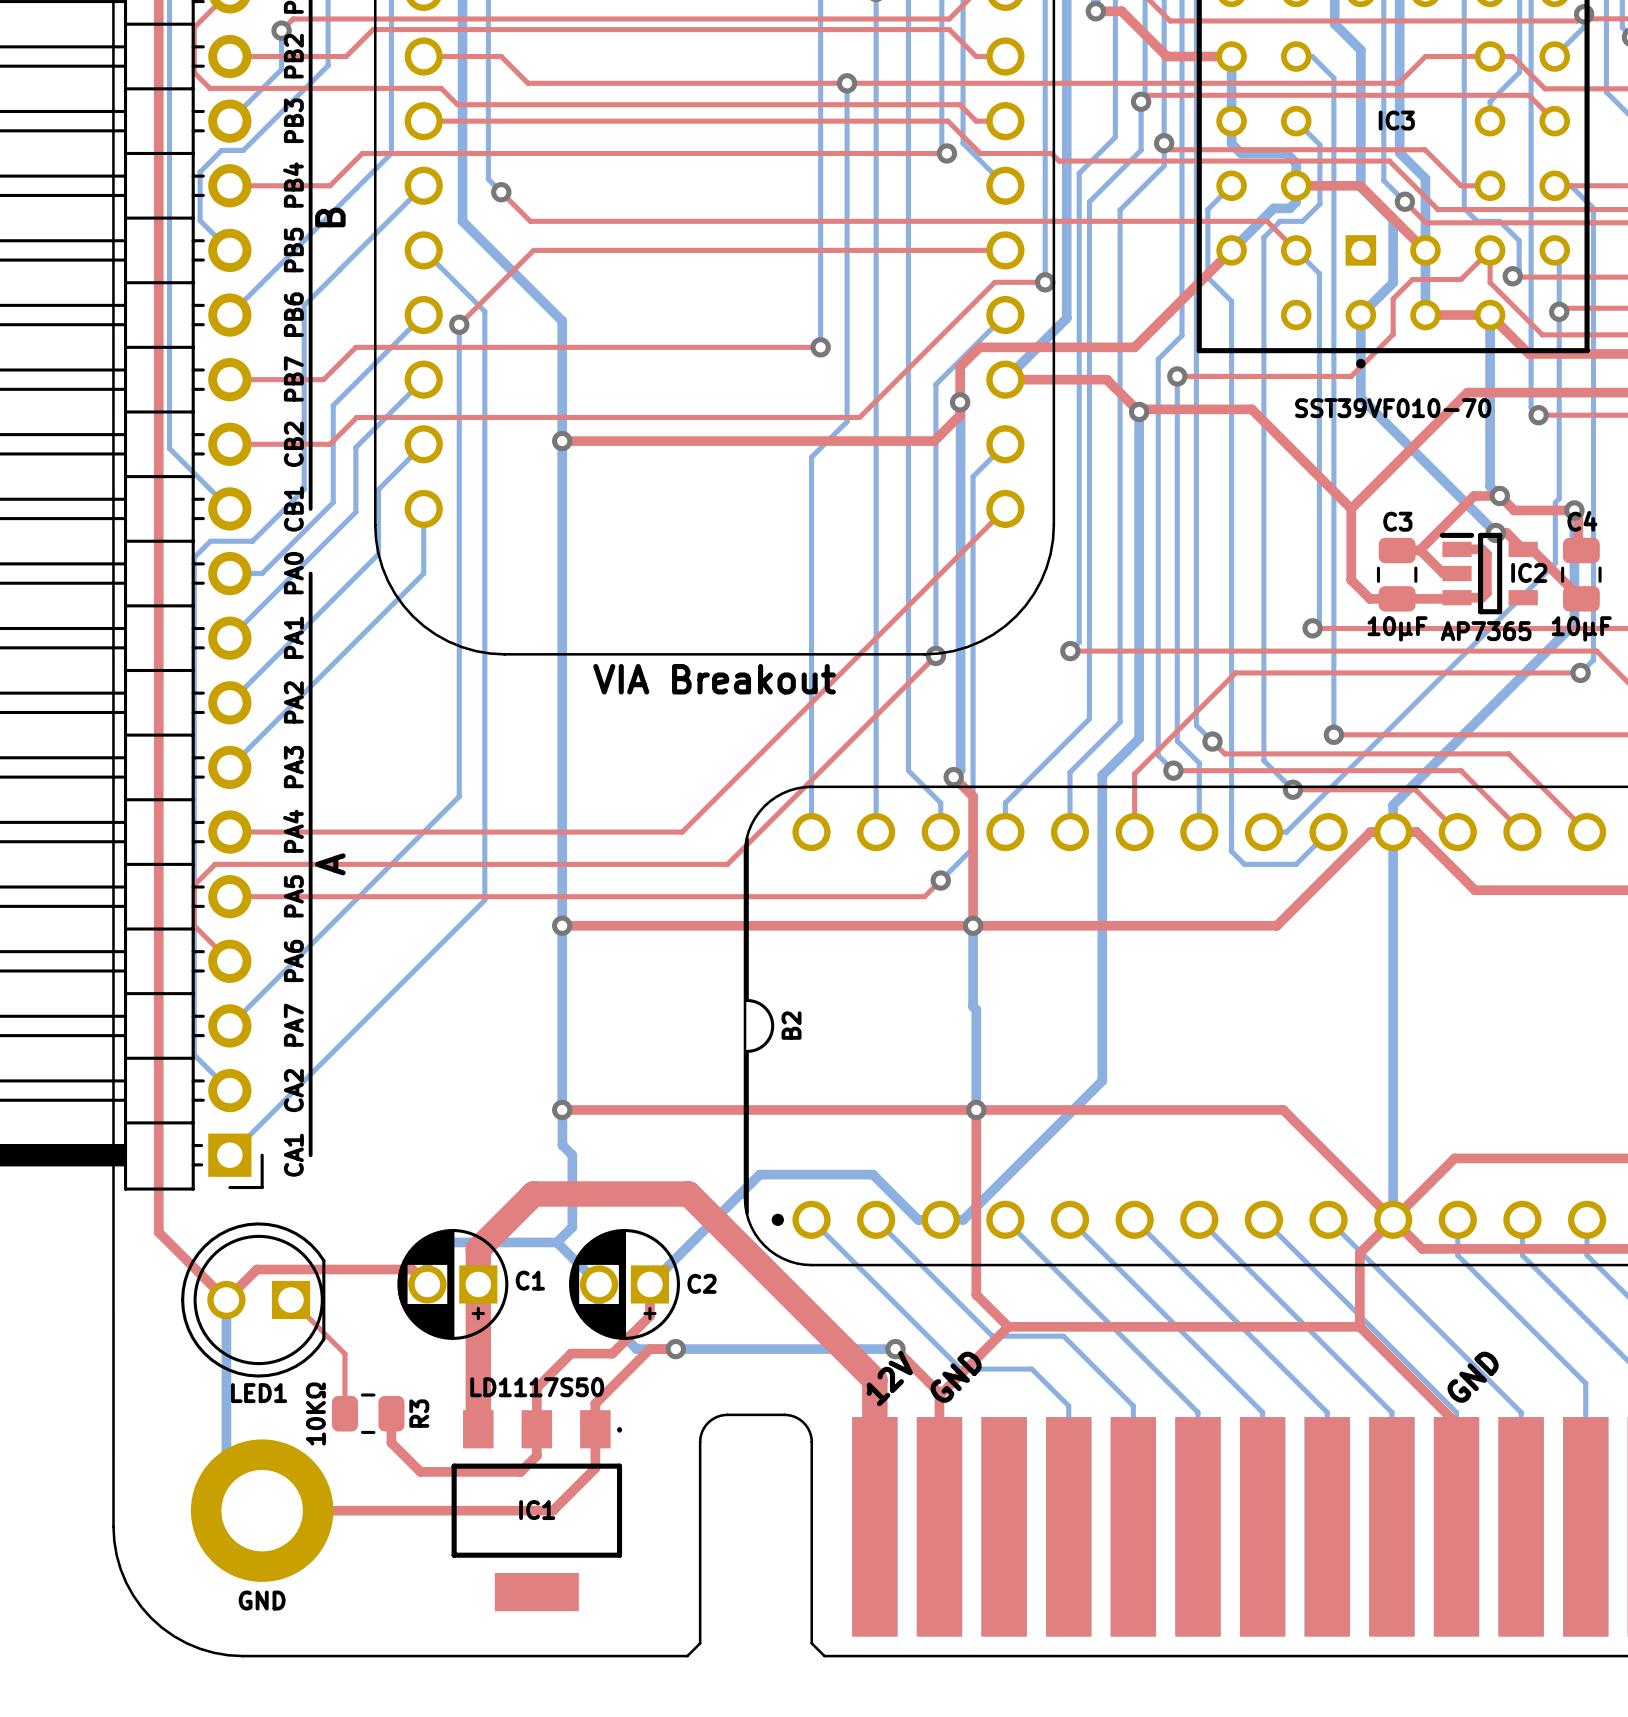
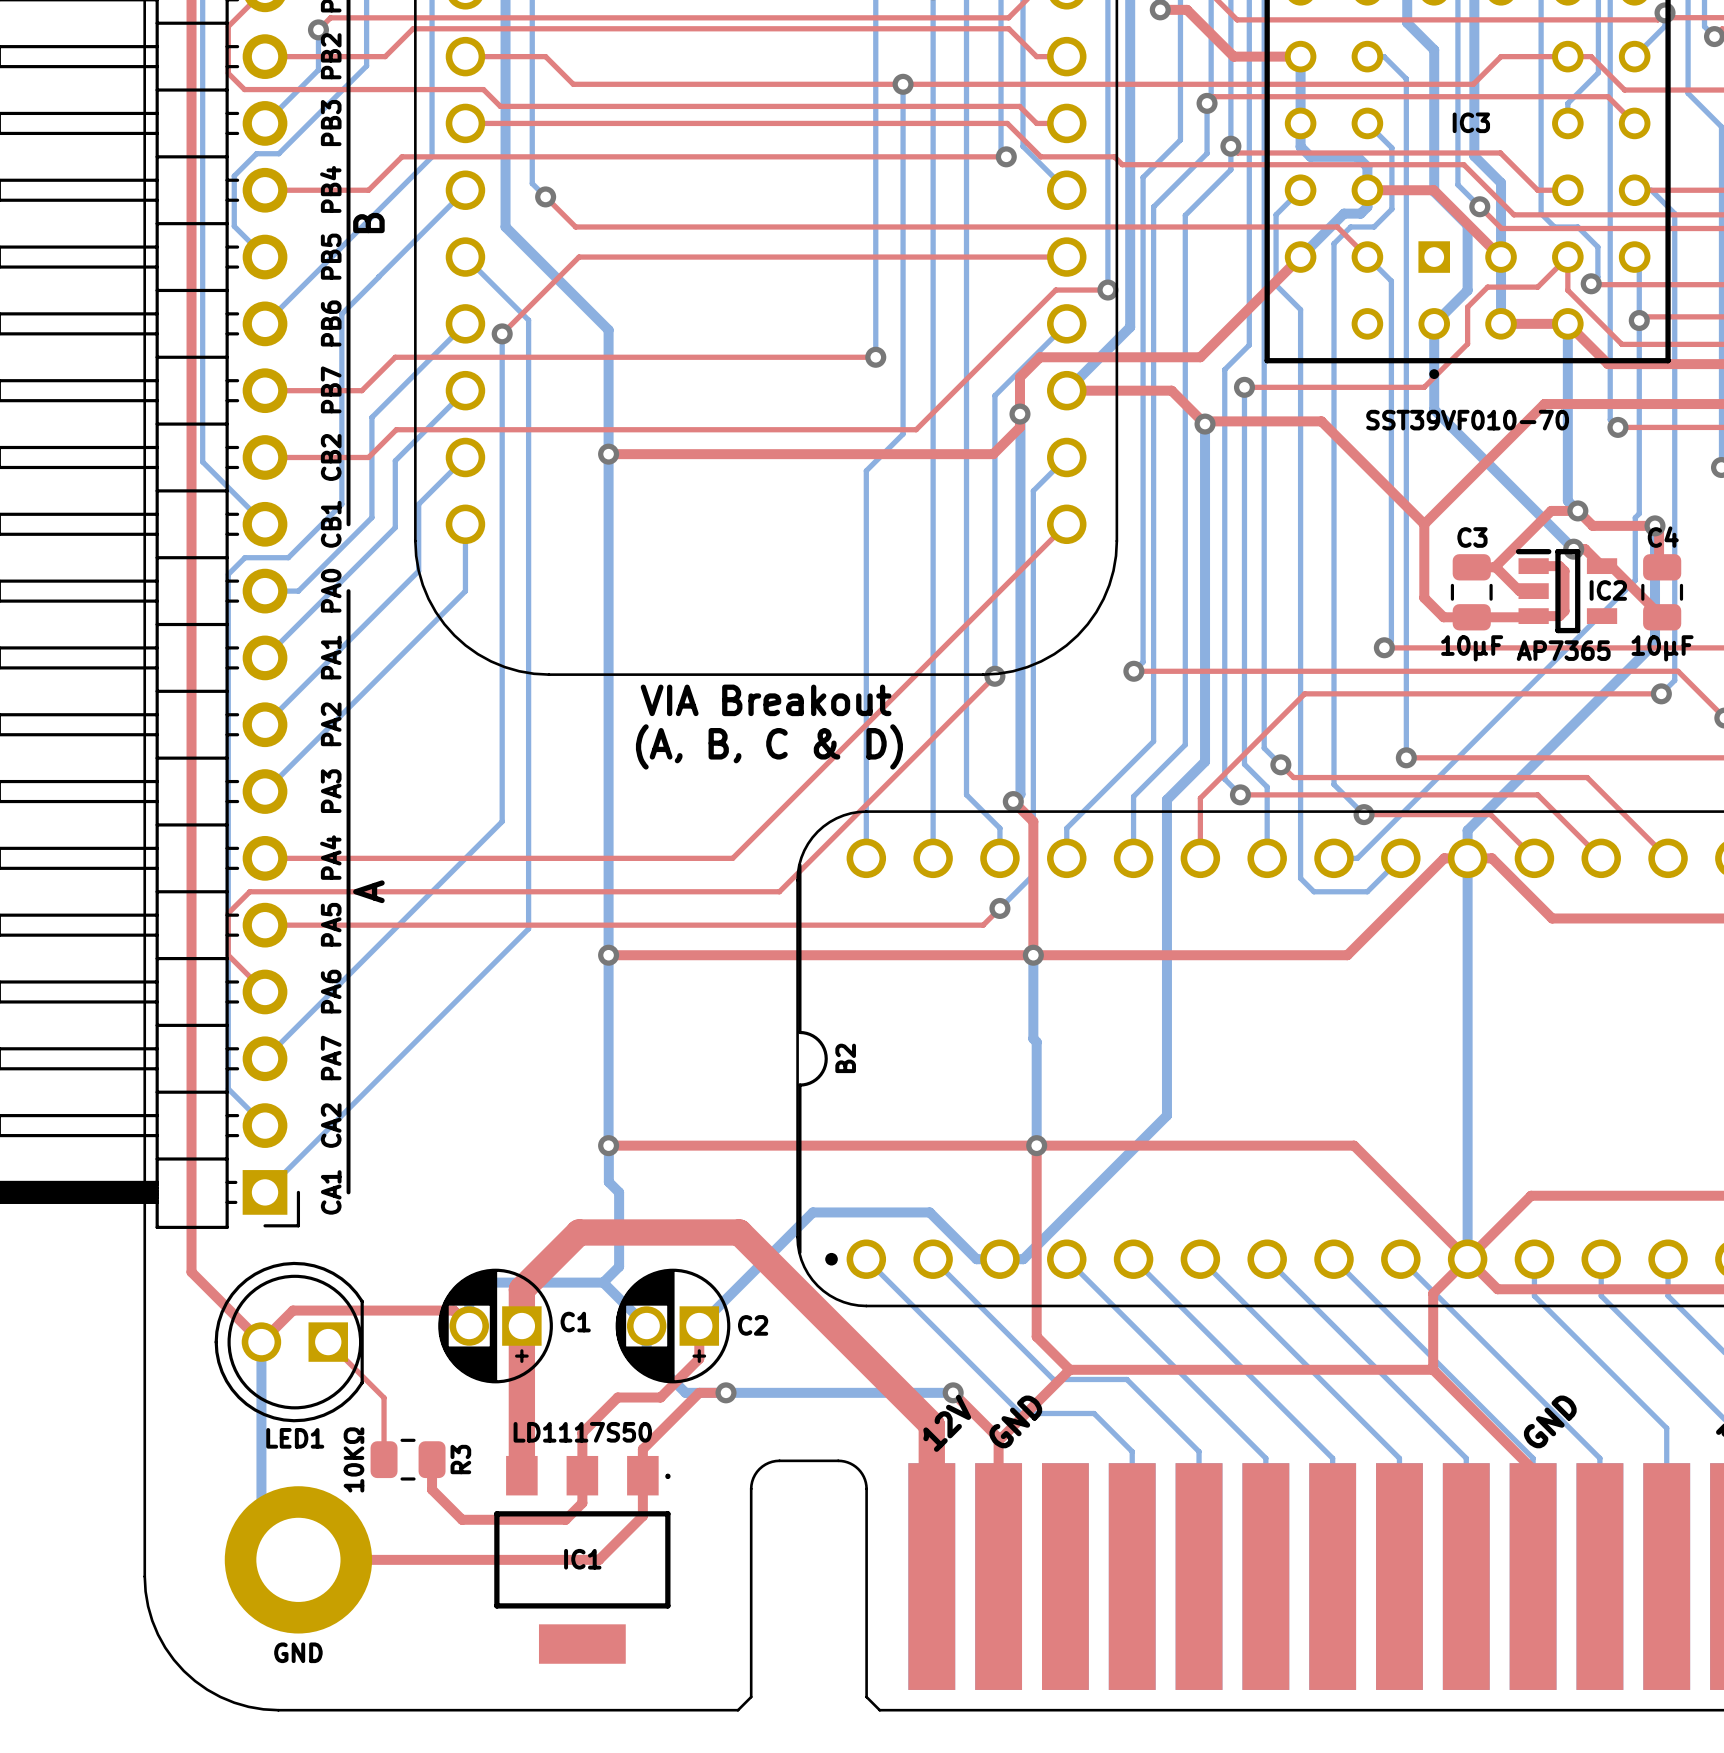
text: none -> (A, B, C & D) (769, 746)

